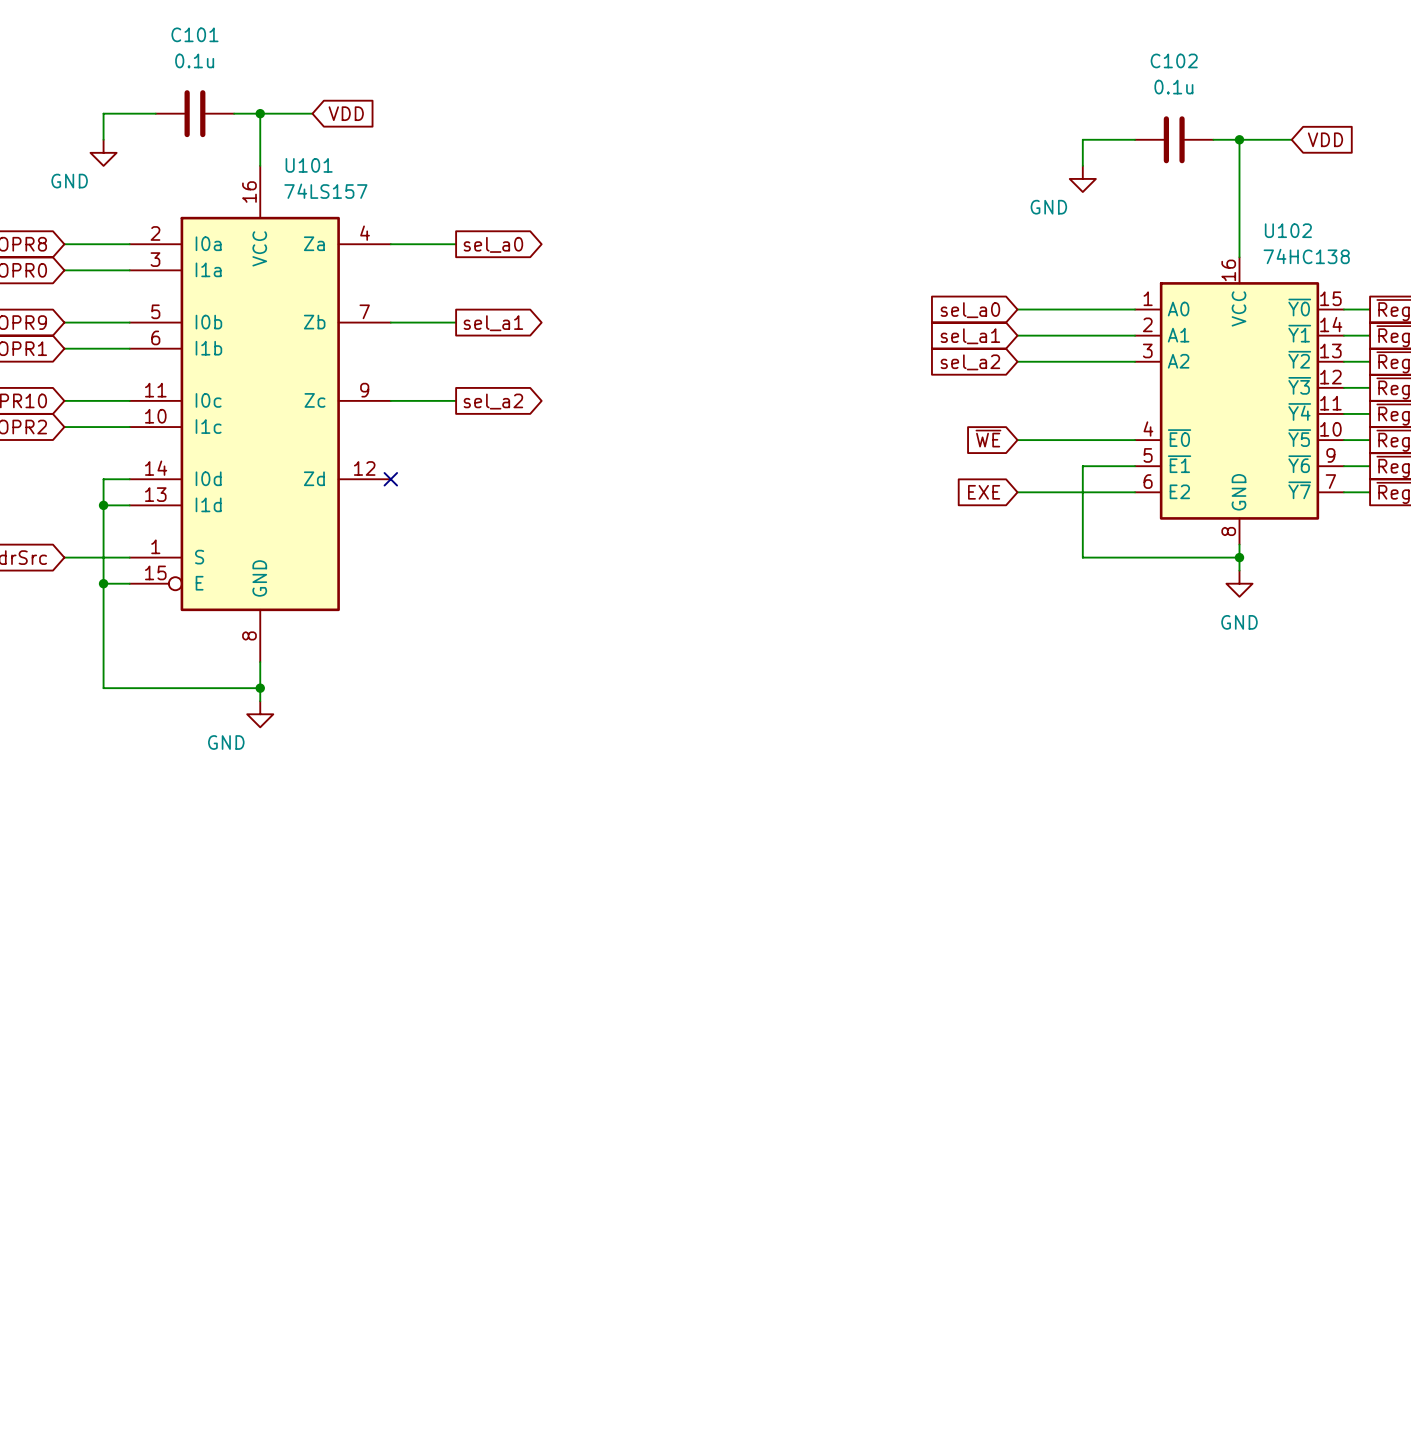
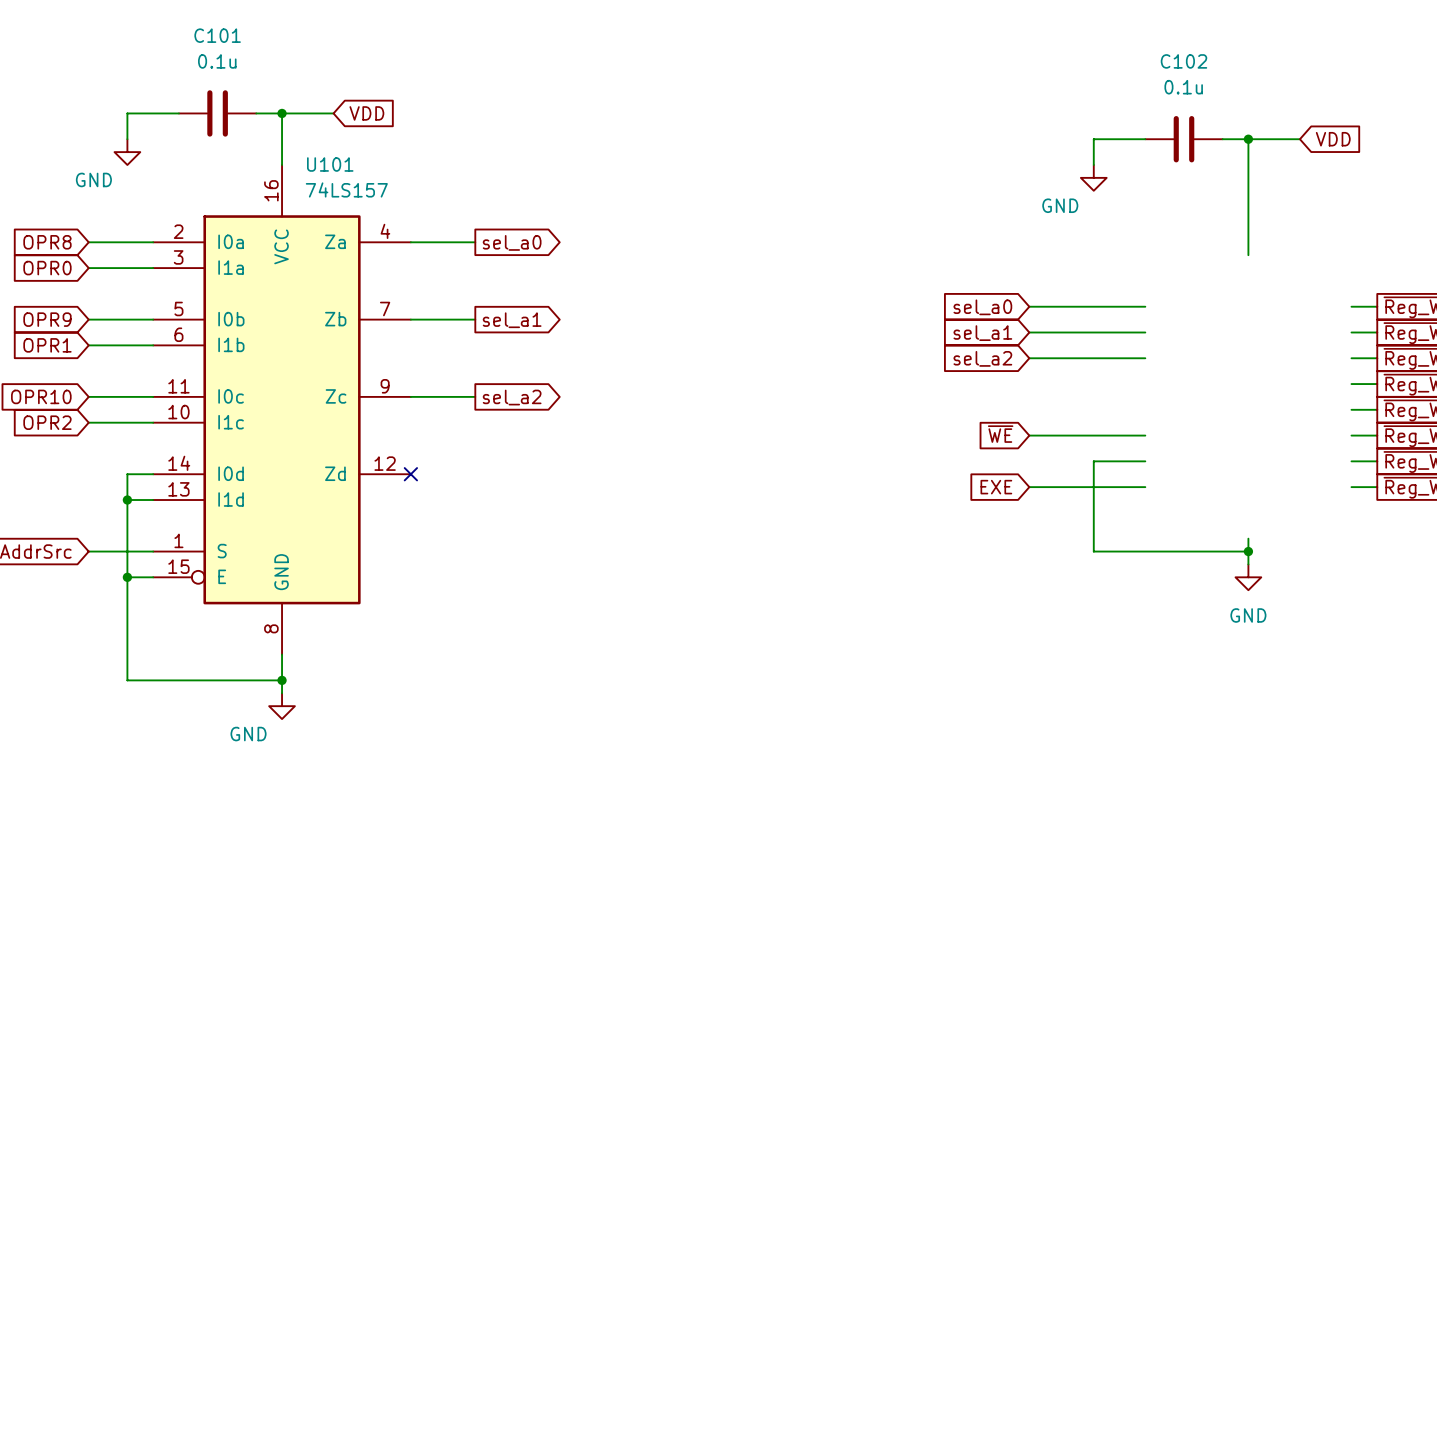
U102: 74HC138 (1239, 400) -> none

